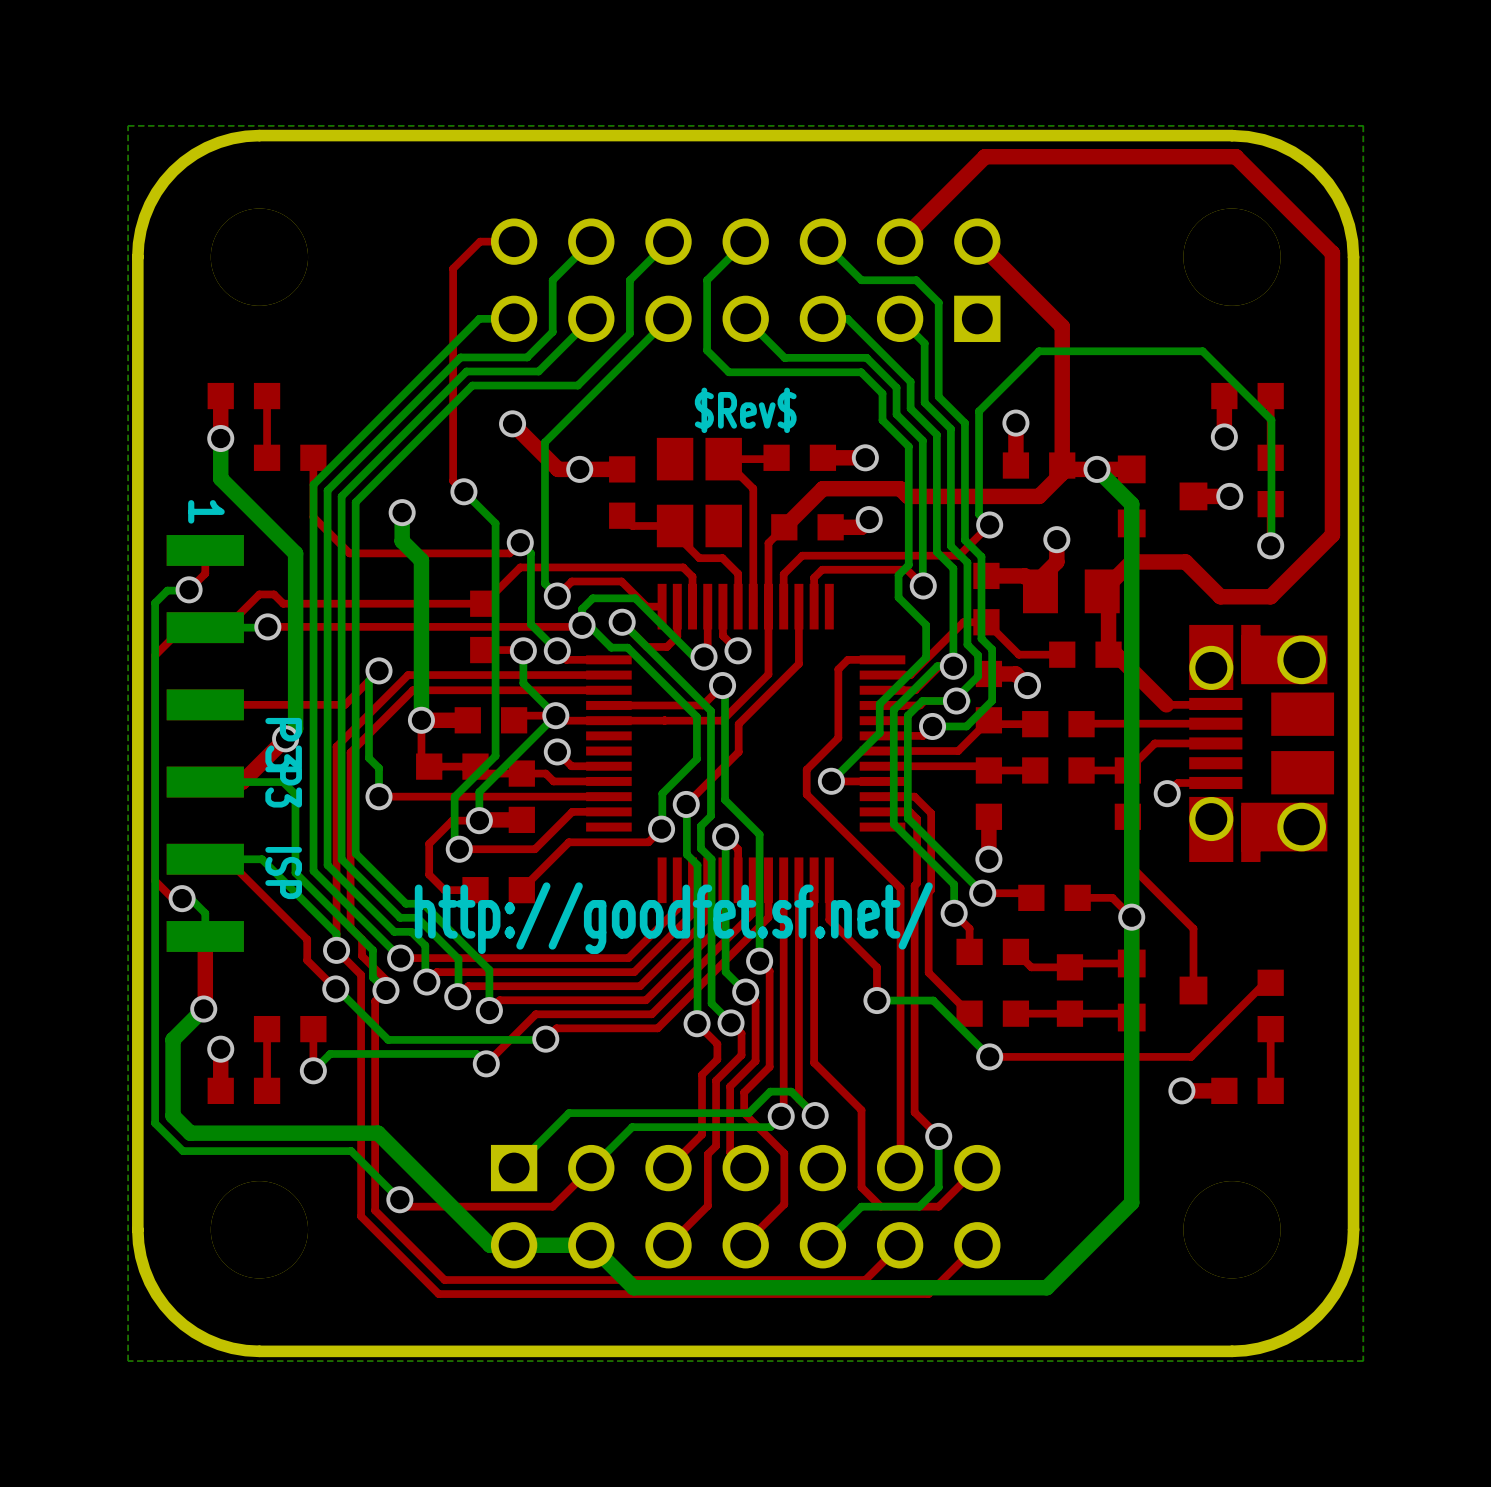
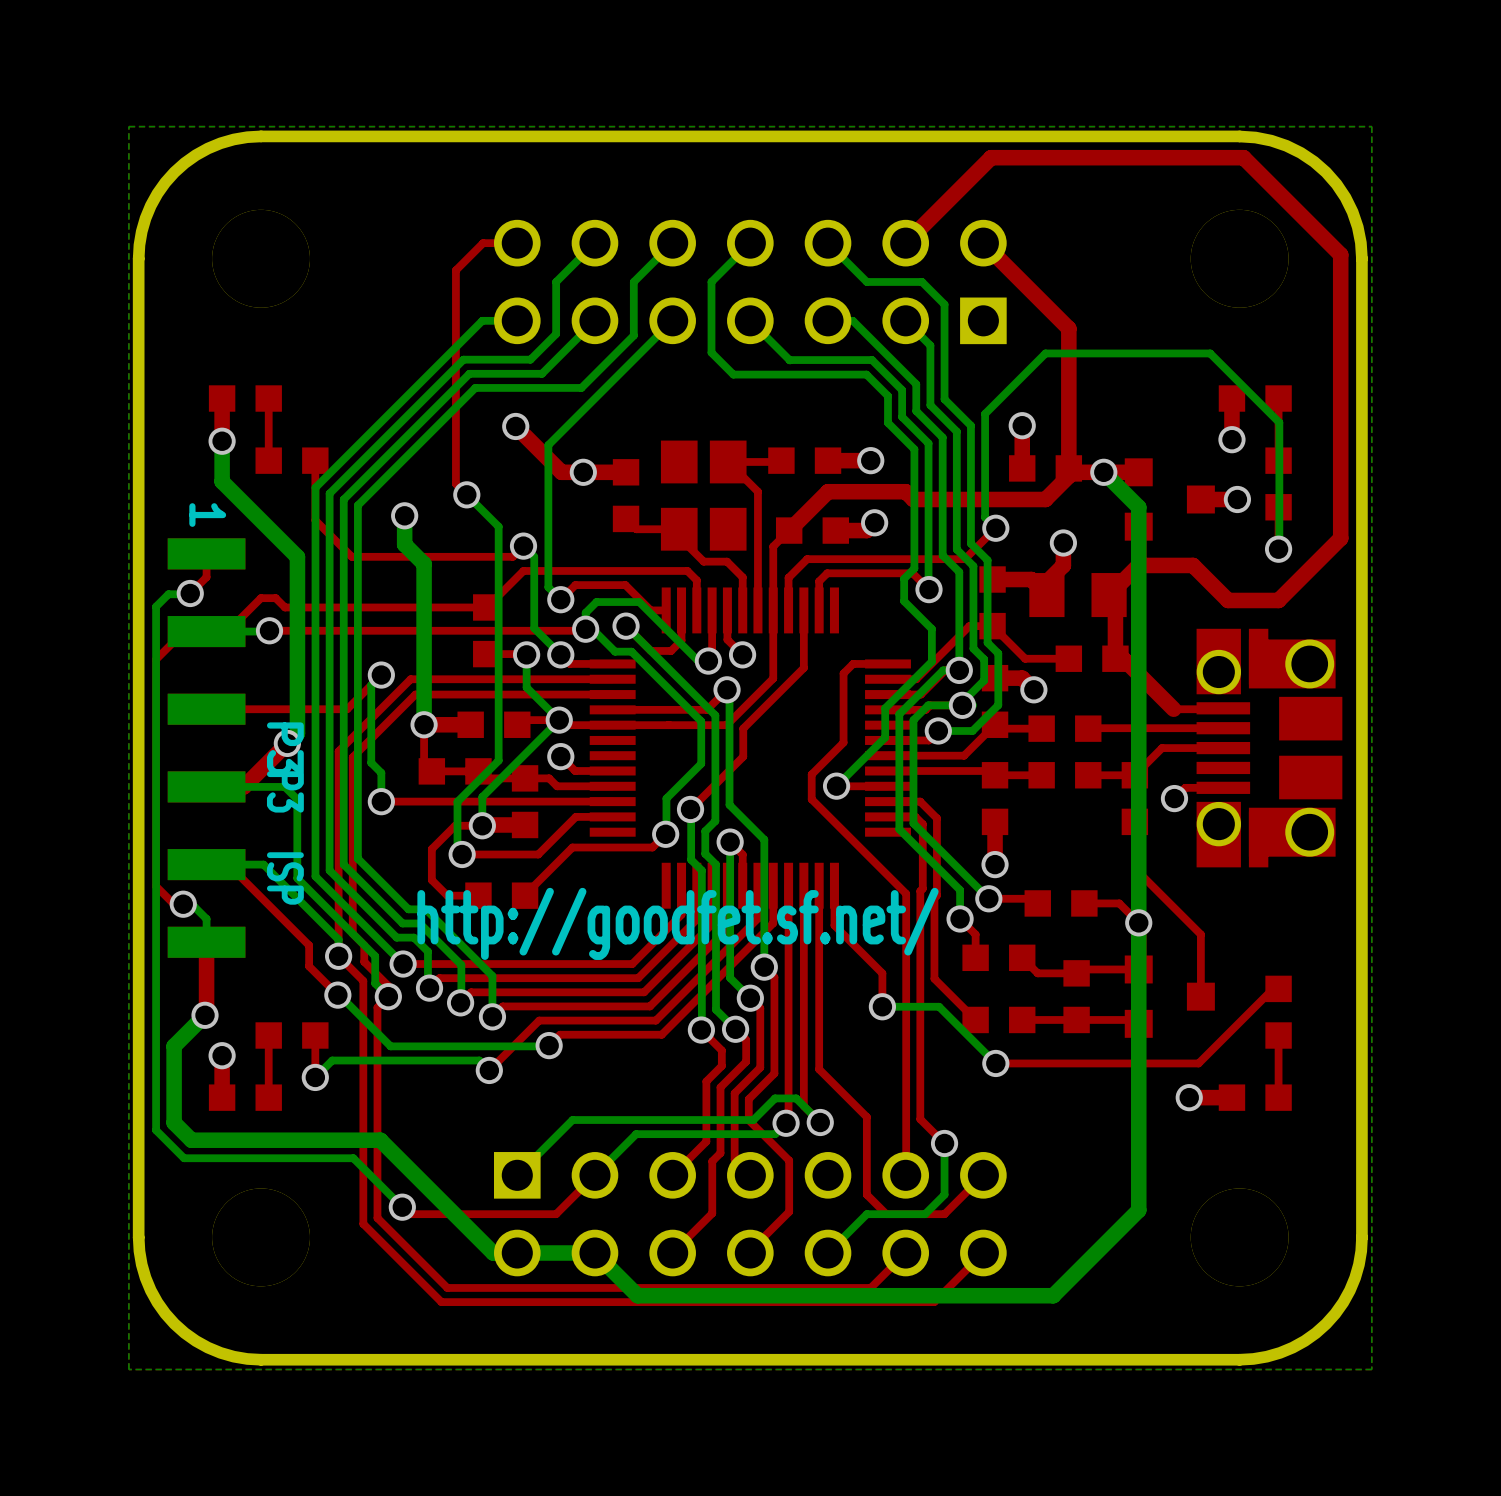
text: $Rev$ (745, 410) -> none

